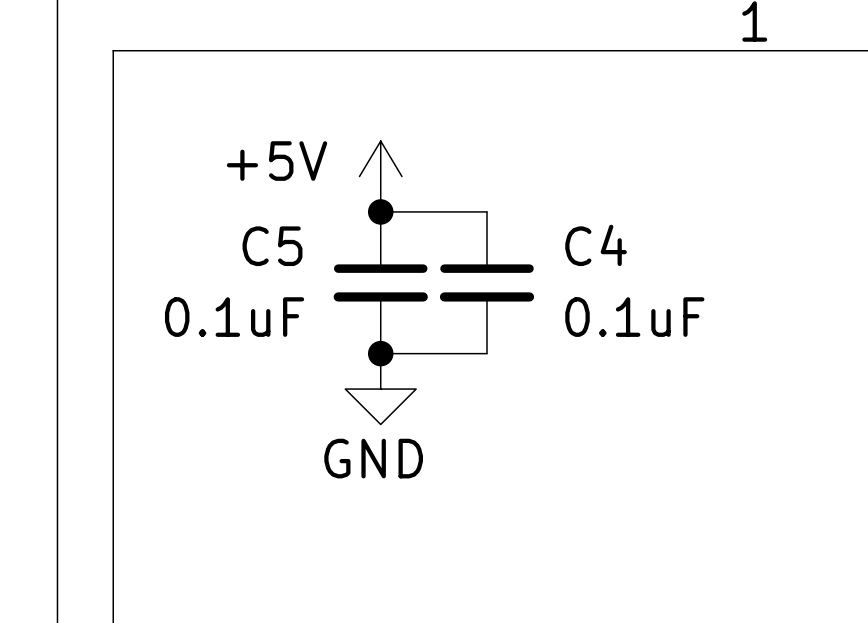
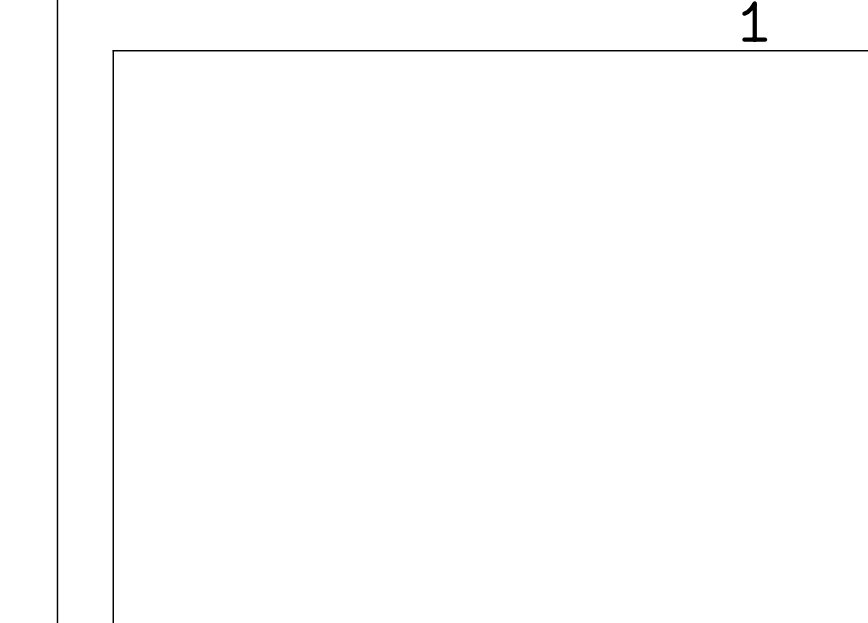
power symbol: +5V (380, 176) -> none
wire: (380, 211) (487, 211) -> none
junction: (380, 211) -> none
C5: 0.1uF (380, 282) -> none
C4: 0.1uF (487, 282) -> none
wire: (380, 353) (487, 353) -> none
junction: (380, 353) -> none
power symbol: GND (380, 389) -> none

